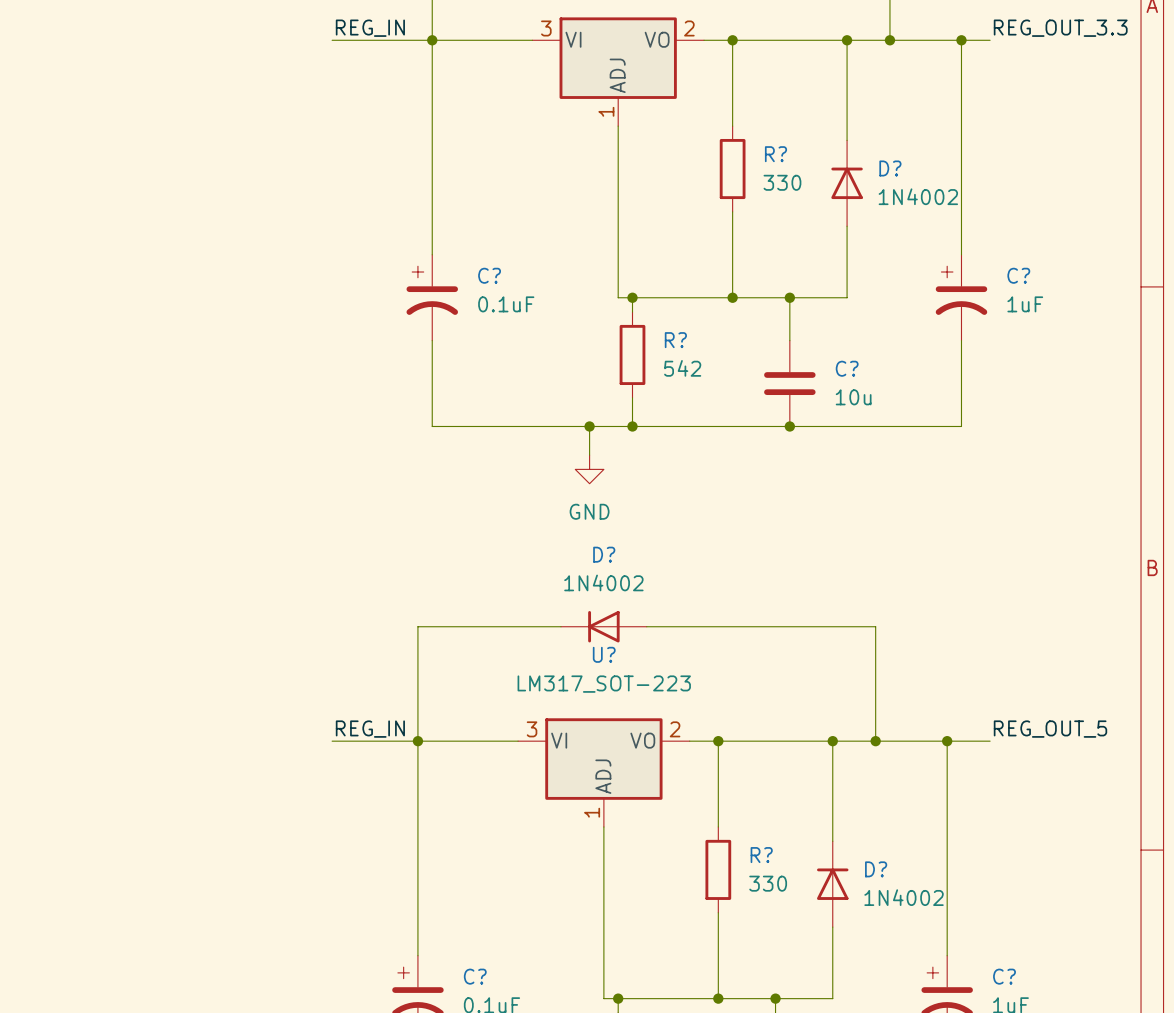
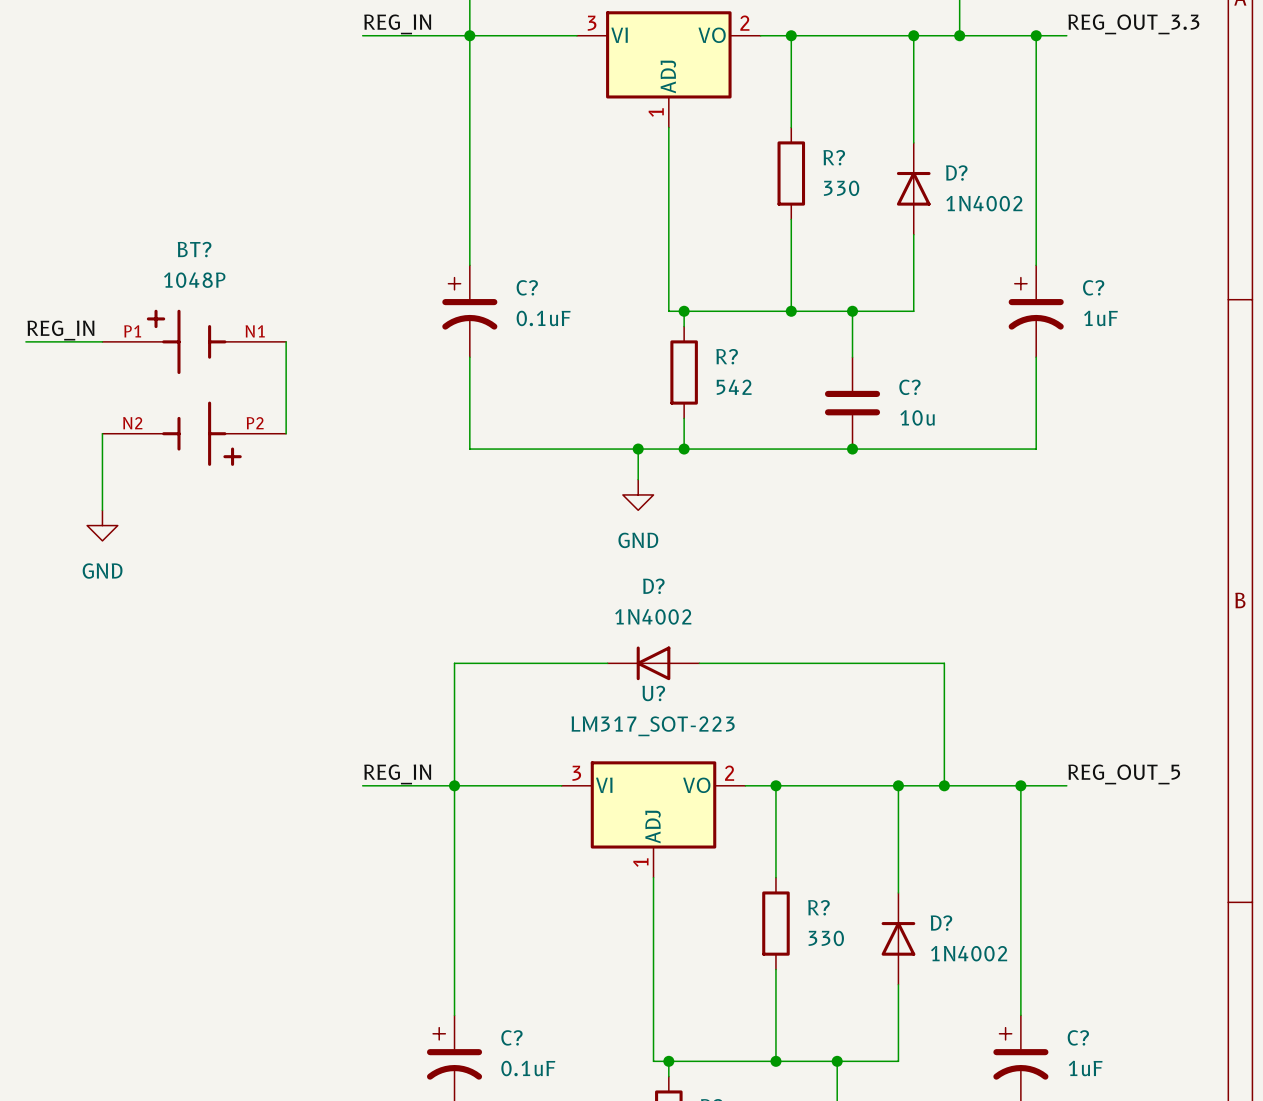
label: none -> REG_IN (60, 330)
wire: none -> (25, 341) (102, 341)
wire: none -> (286, 341) (286, 433)
BT?: none -> 1048P (194, 387)
wire: none -> (102, 433) (102, 510)
power symbol: none -> GND (102, 525)

